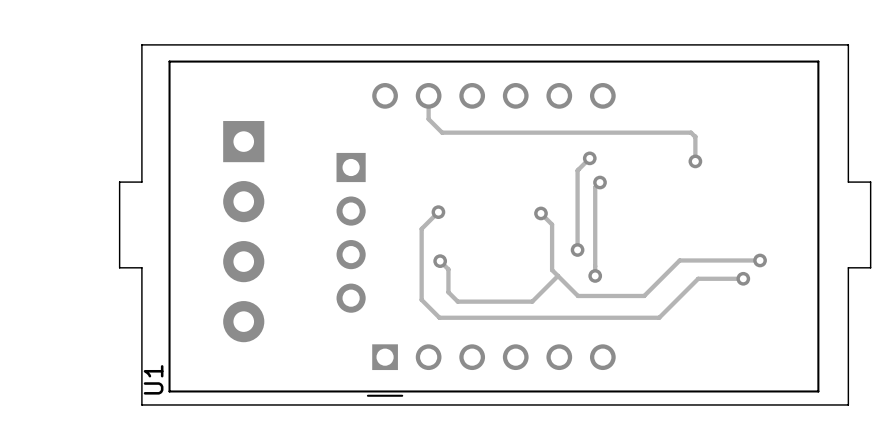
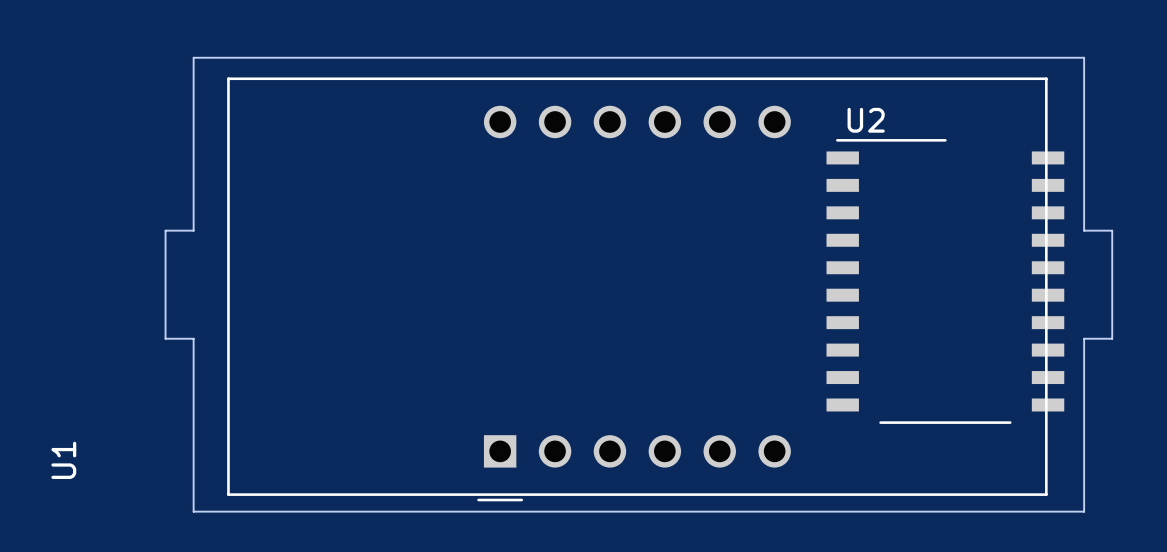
track: (428, 95) (428, 119) (442, 132) (691, 132) (695, 136) (695, 161) -> none
track: (589, 158) (577, 170) (577, 249) -> none
via: (589, 158) -> none
via: (695, 161) -> none
track: (600, 182) (595, 187) (595, 275) -> none
via: (600, 182) -> none
track: (438, 212) (421, 228) (421, 299) (439, 317) (659, 317) (698, 278) (743, 278) -> none
via: (438, 212) -> none
track: (540, 213) (552, 224) (552, 270) (578, 295) (644, 295) (679, 260) (760, 260) -> none
via: (540, 213) -> none
U2: none -> (945, 281)
part: (243, 231) -> none
part: (351, 232) -> none
via: (577, 249) -> none
via: (760, 260) -> none
track: (440, 261) (448, 269) (448, 292) (457, 301) (532, 301) (557, 275) -> none
via: (440, 261) -> none
via: (595, 275) -> none
via: (743, 278) -> none
U1 name position: U1 (153, 379) -> U1 (63, 460)

